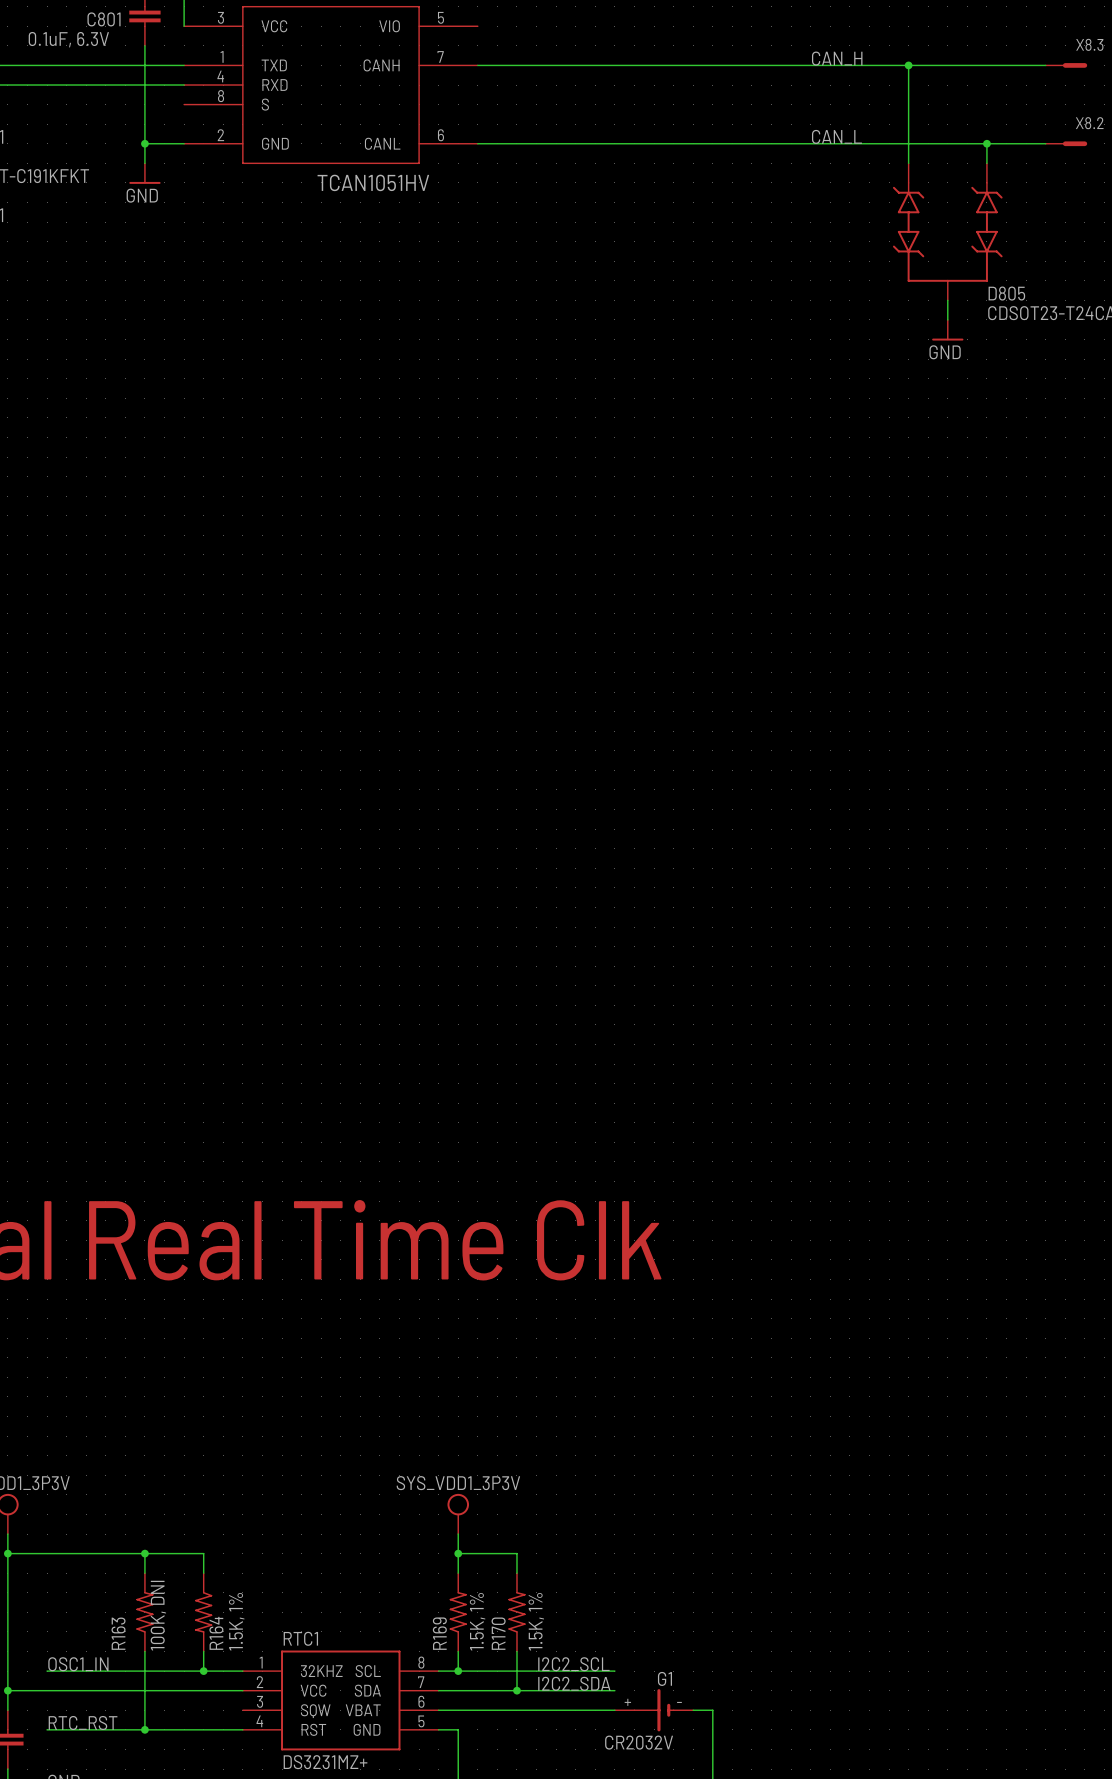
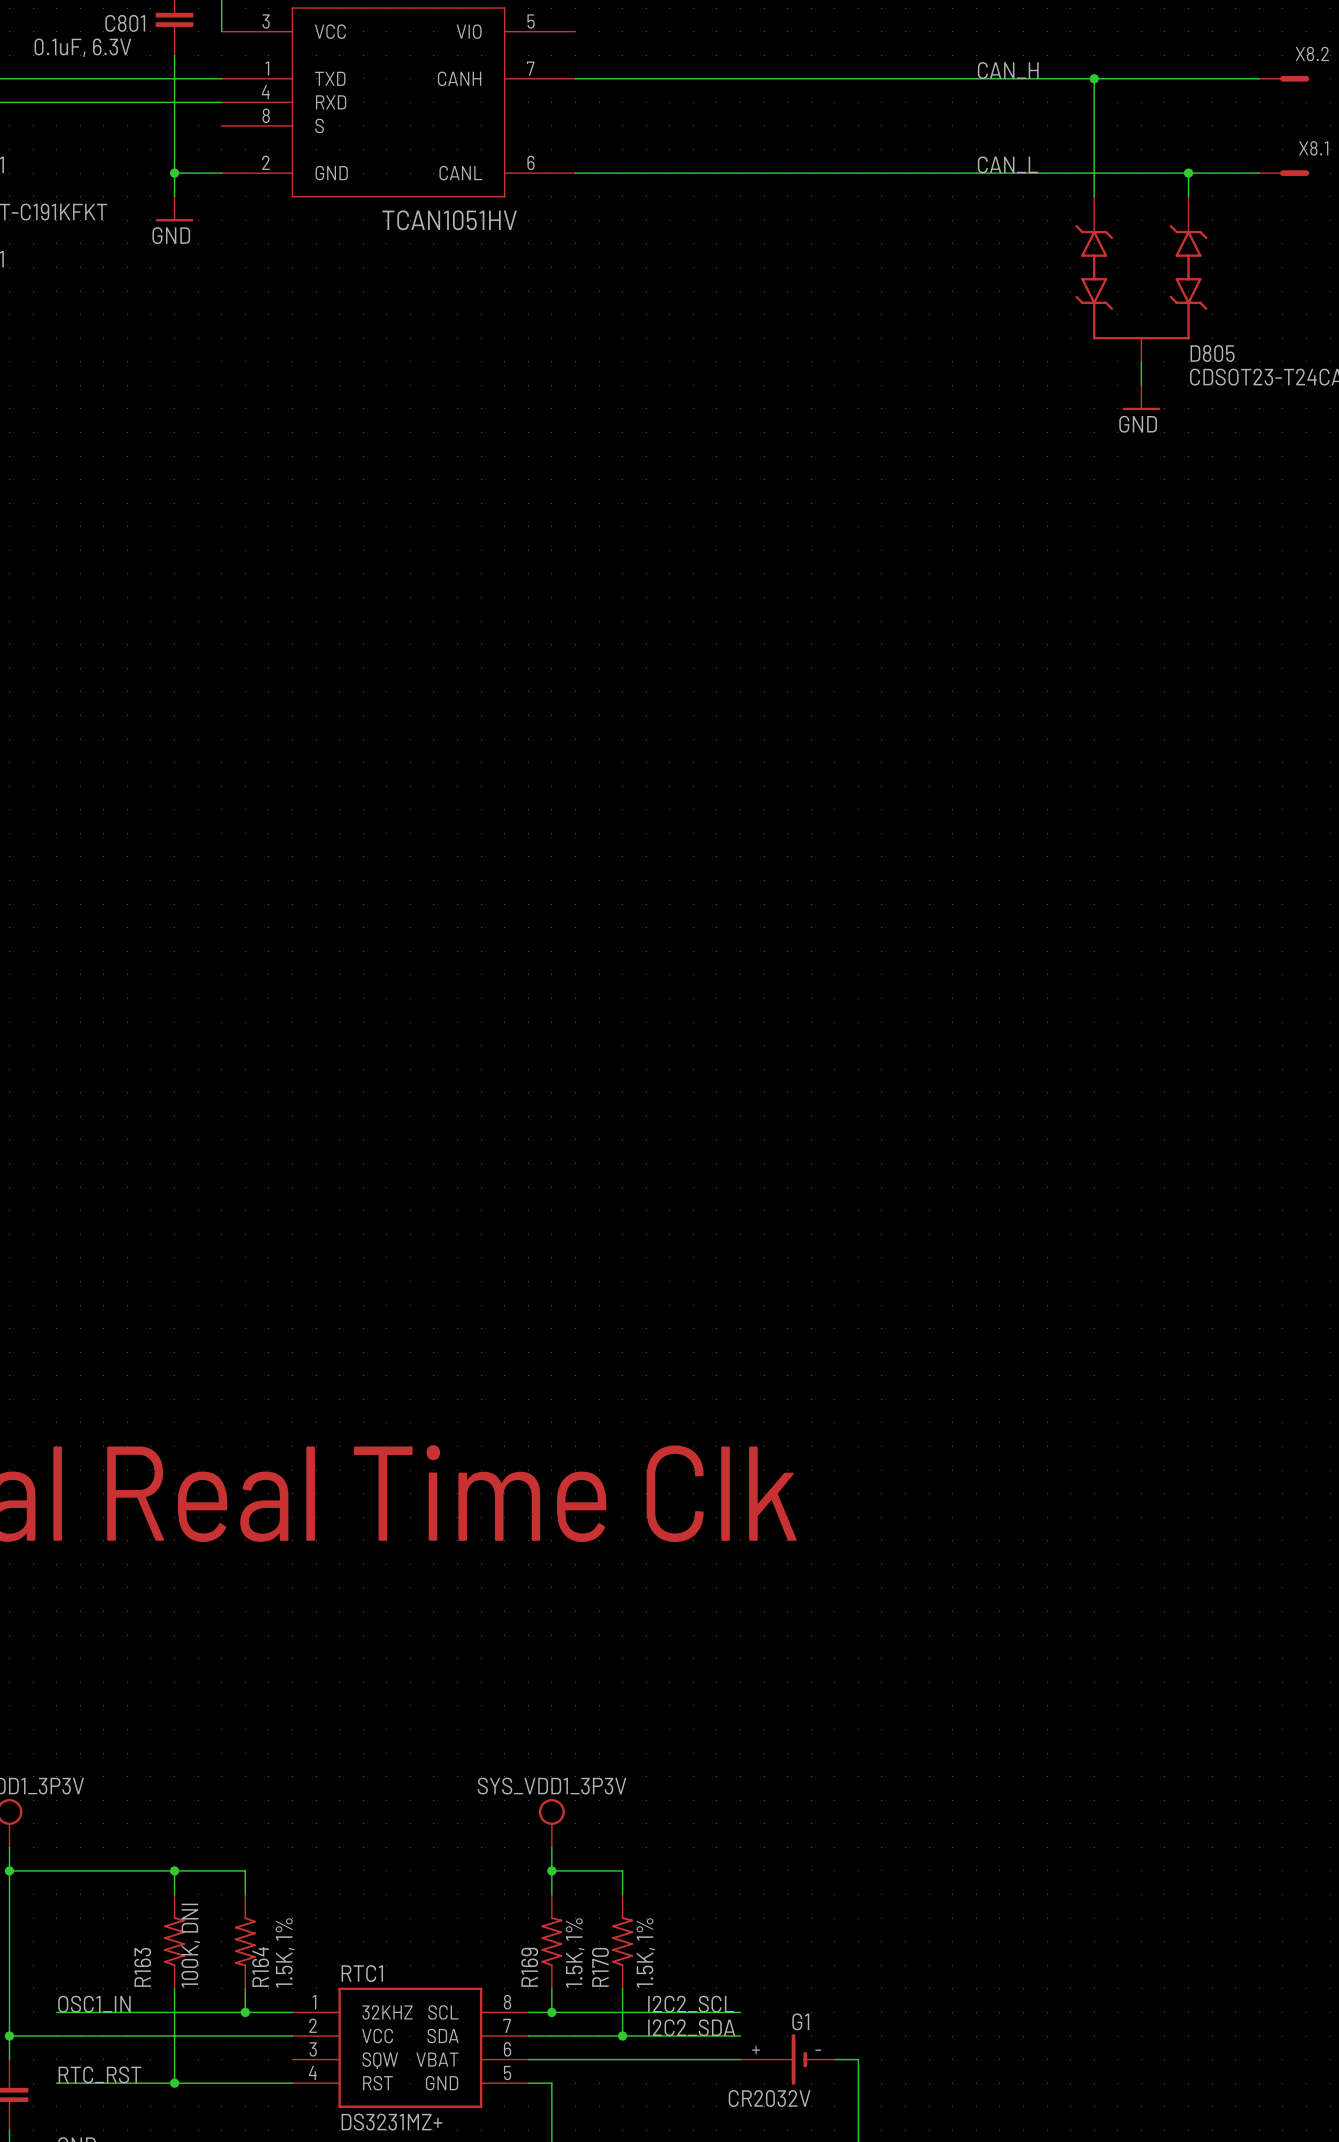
X8.3 name: X8.3 (1089, 44) -> X8.2 (1312, 54)
X8.2 name: X8.2 (1089, 123) -> X8.1 (1313, 148)

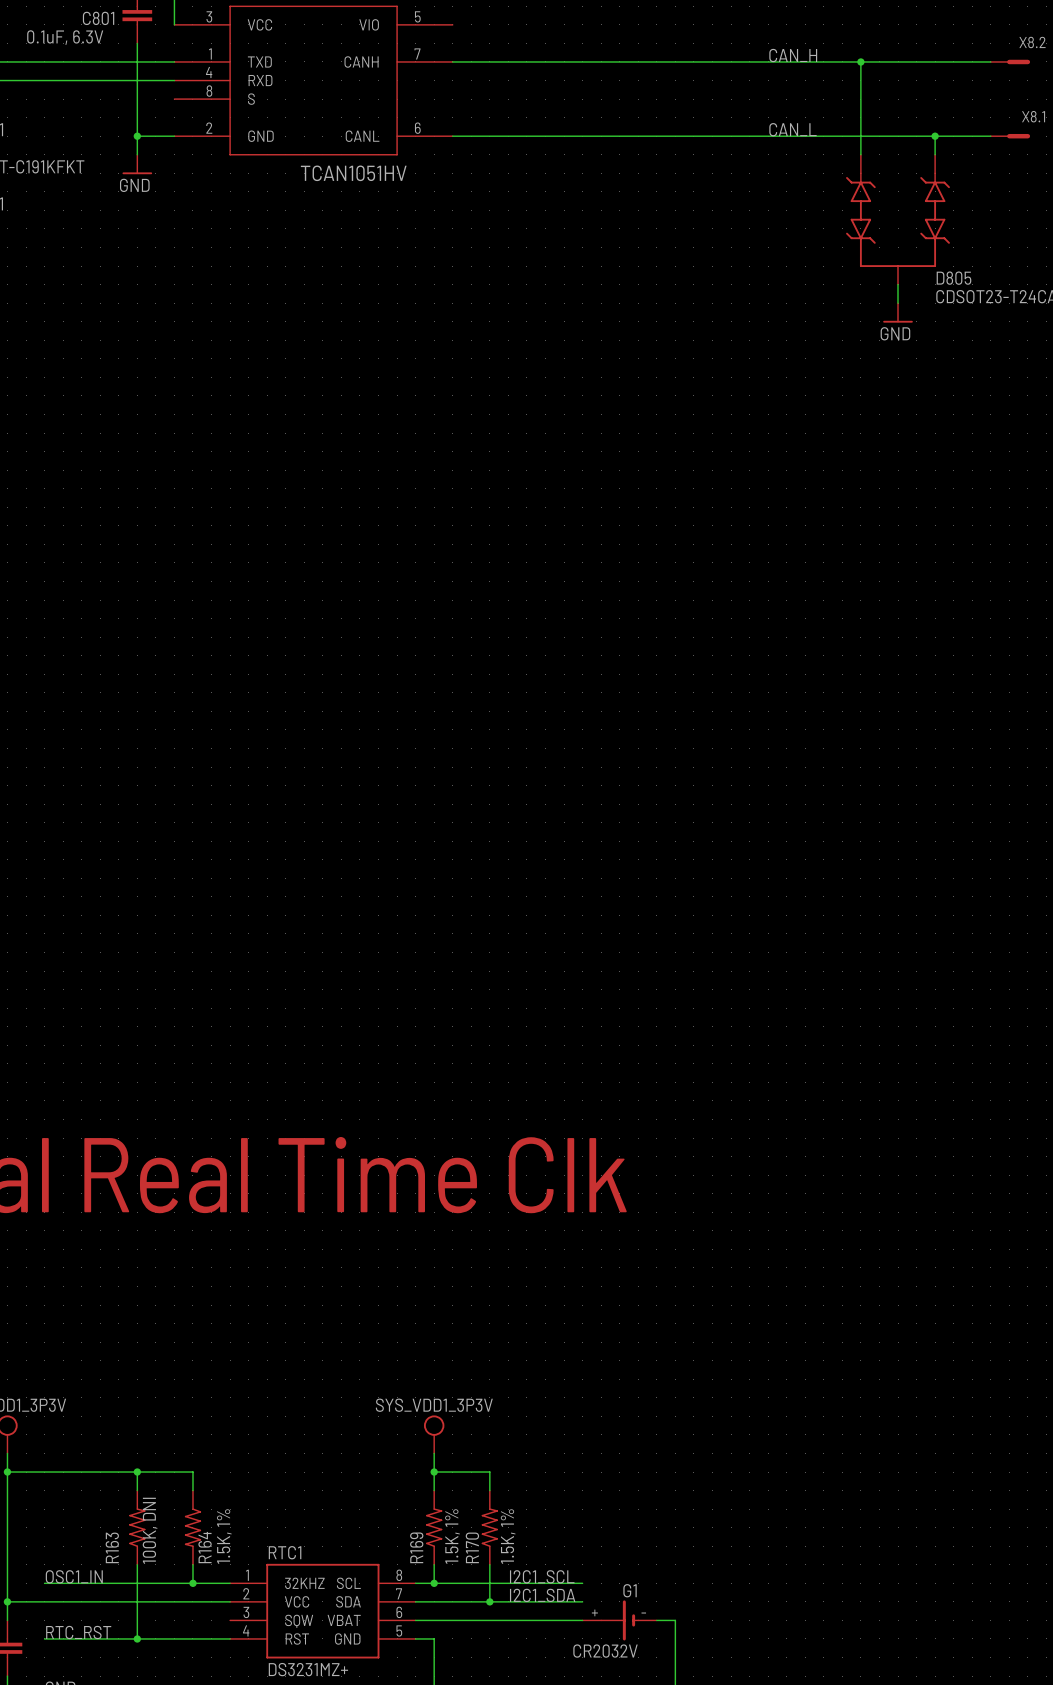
label: I2C2_SCL (691, 2004) -> I2C1_SCL (542, 1576)
label: I2C2_SDA (691, 2027) -> I2C1_SDA (542, 1595)

